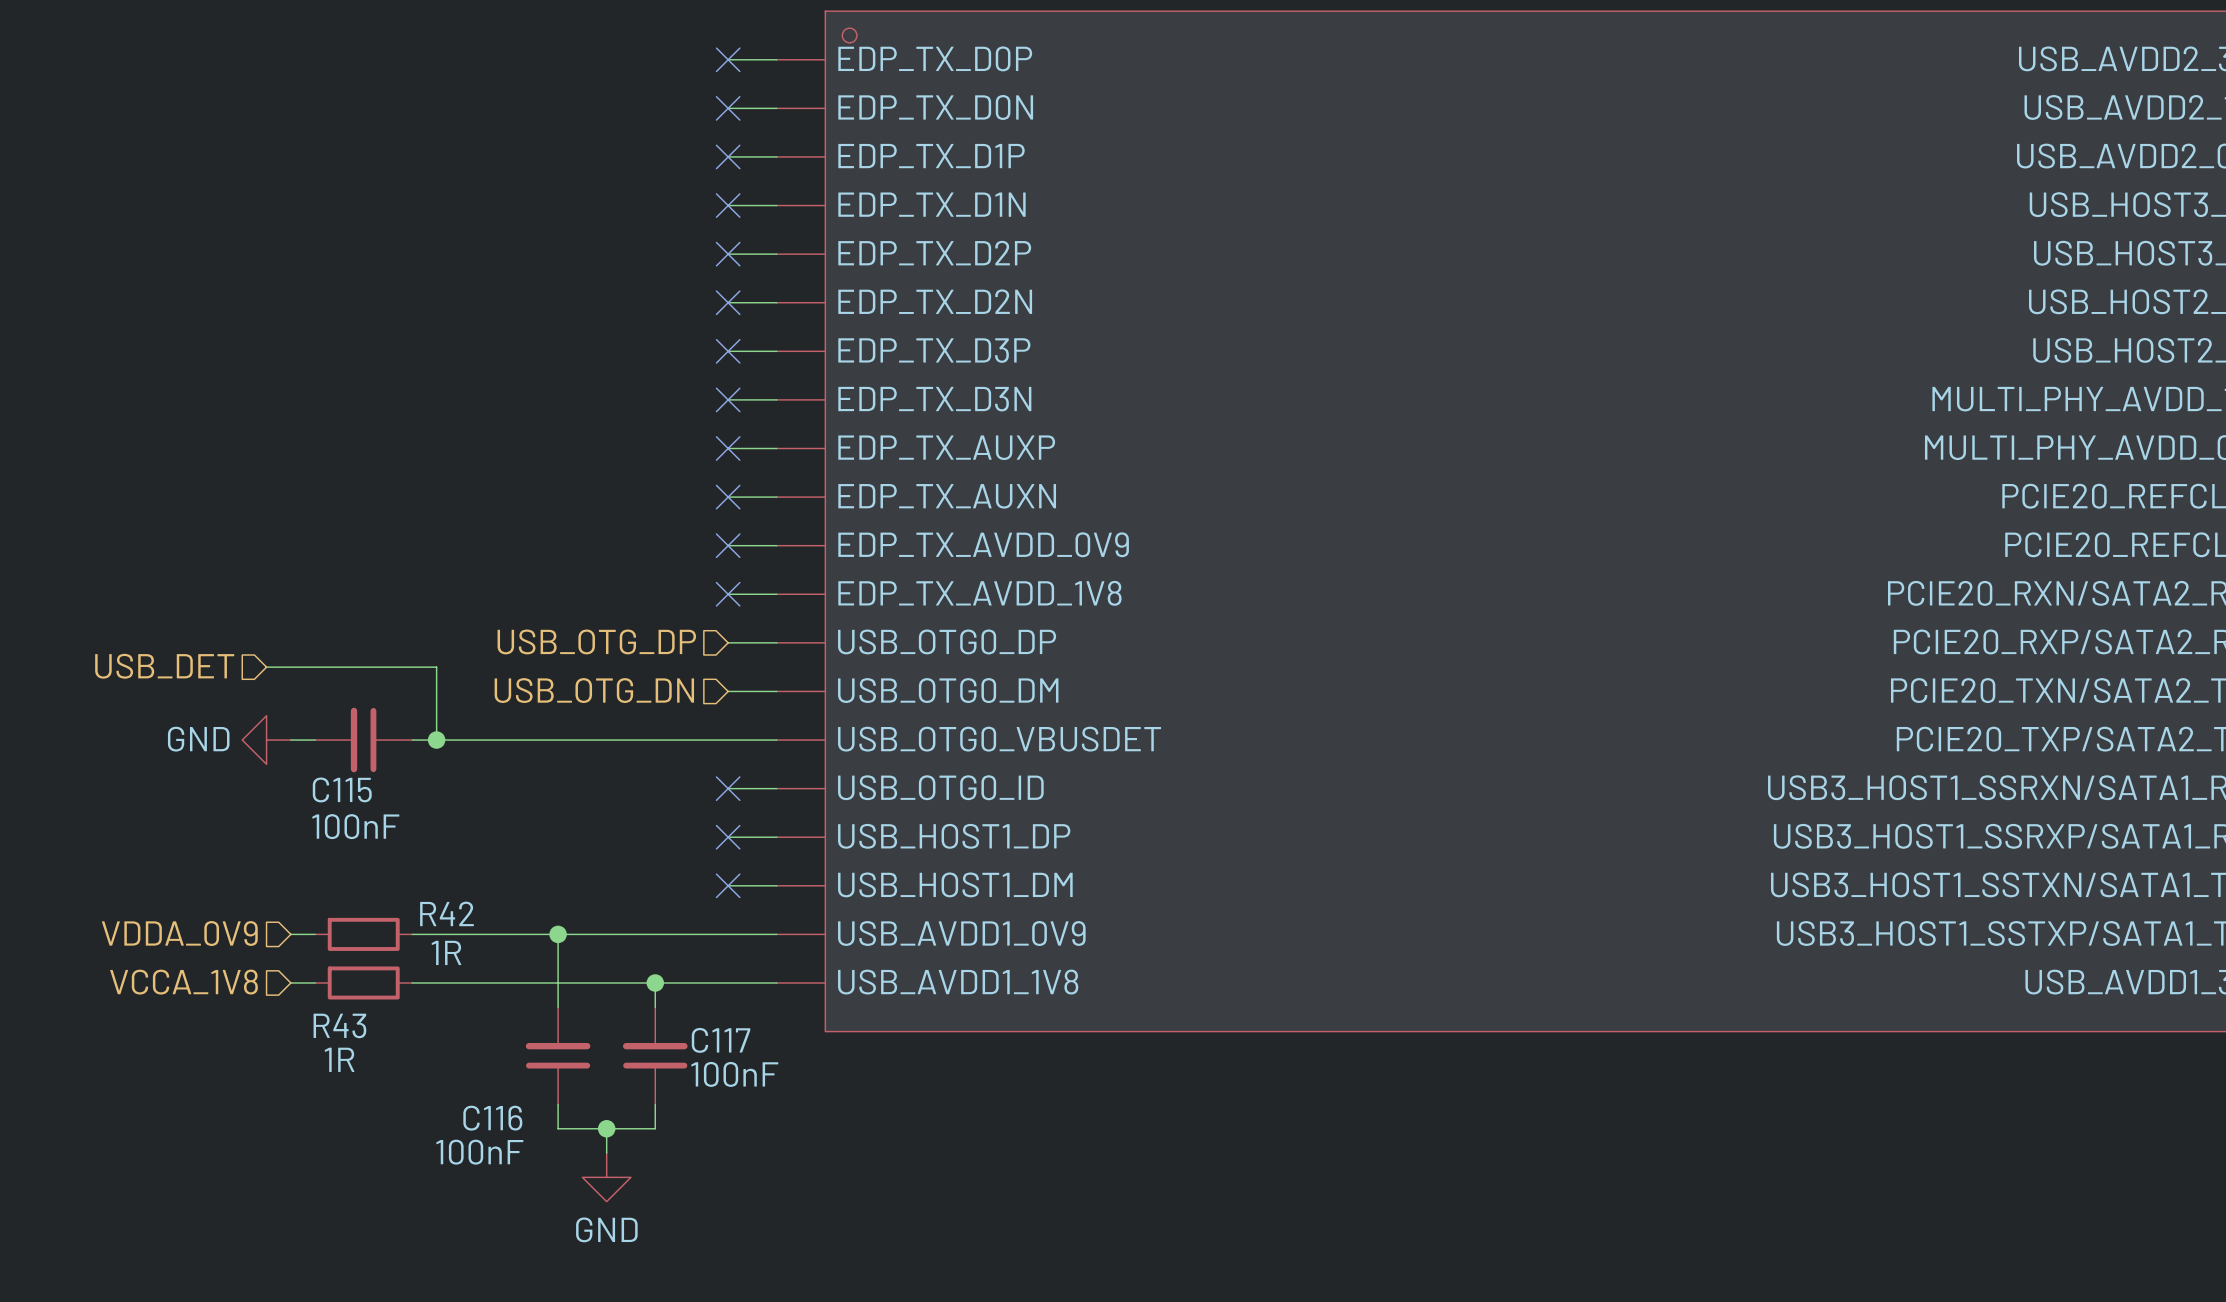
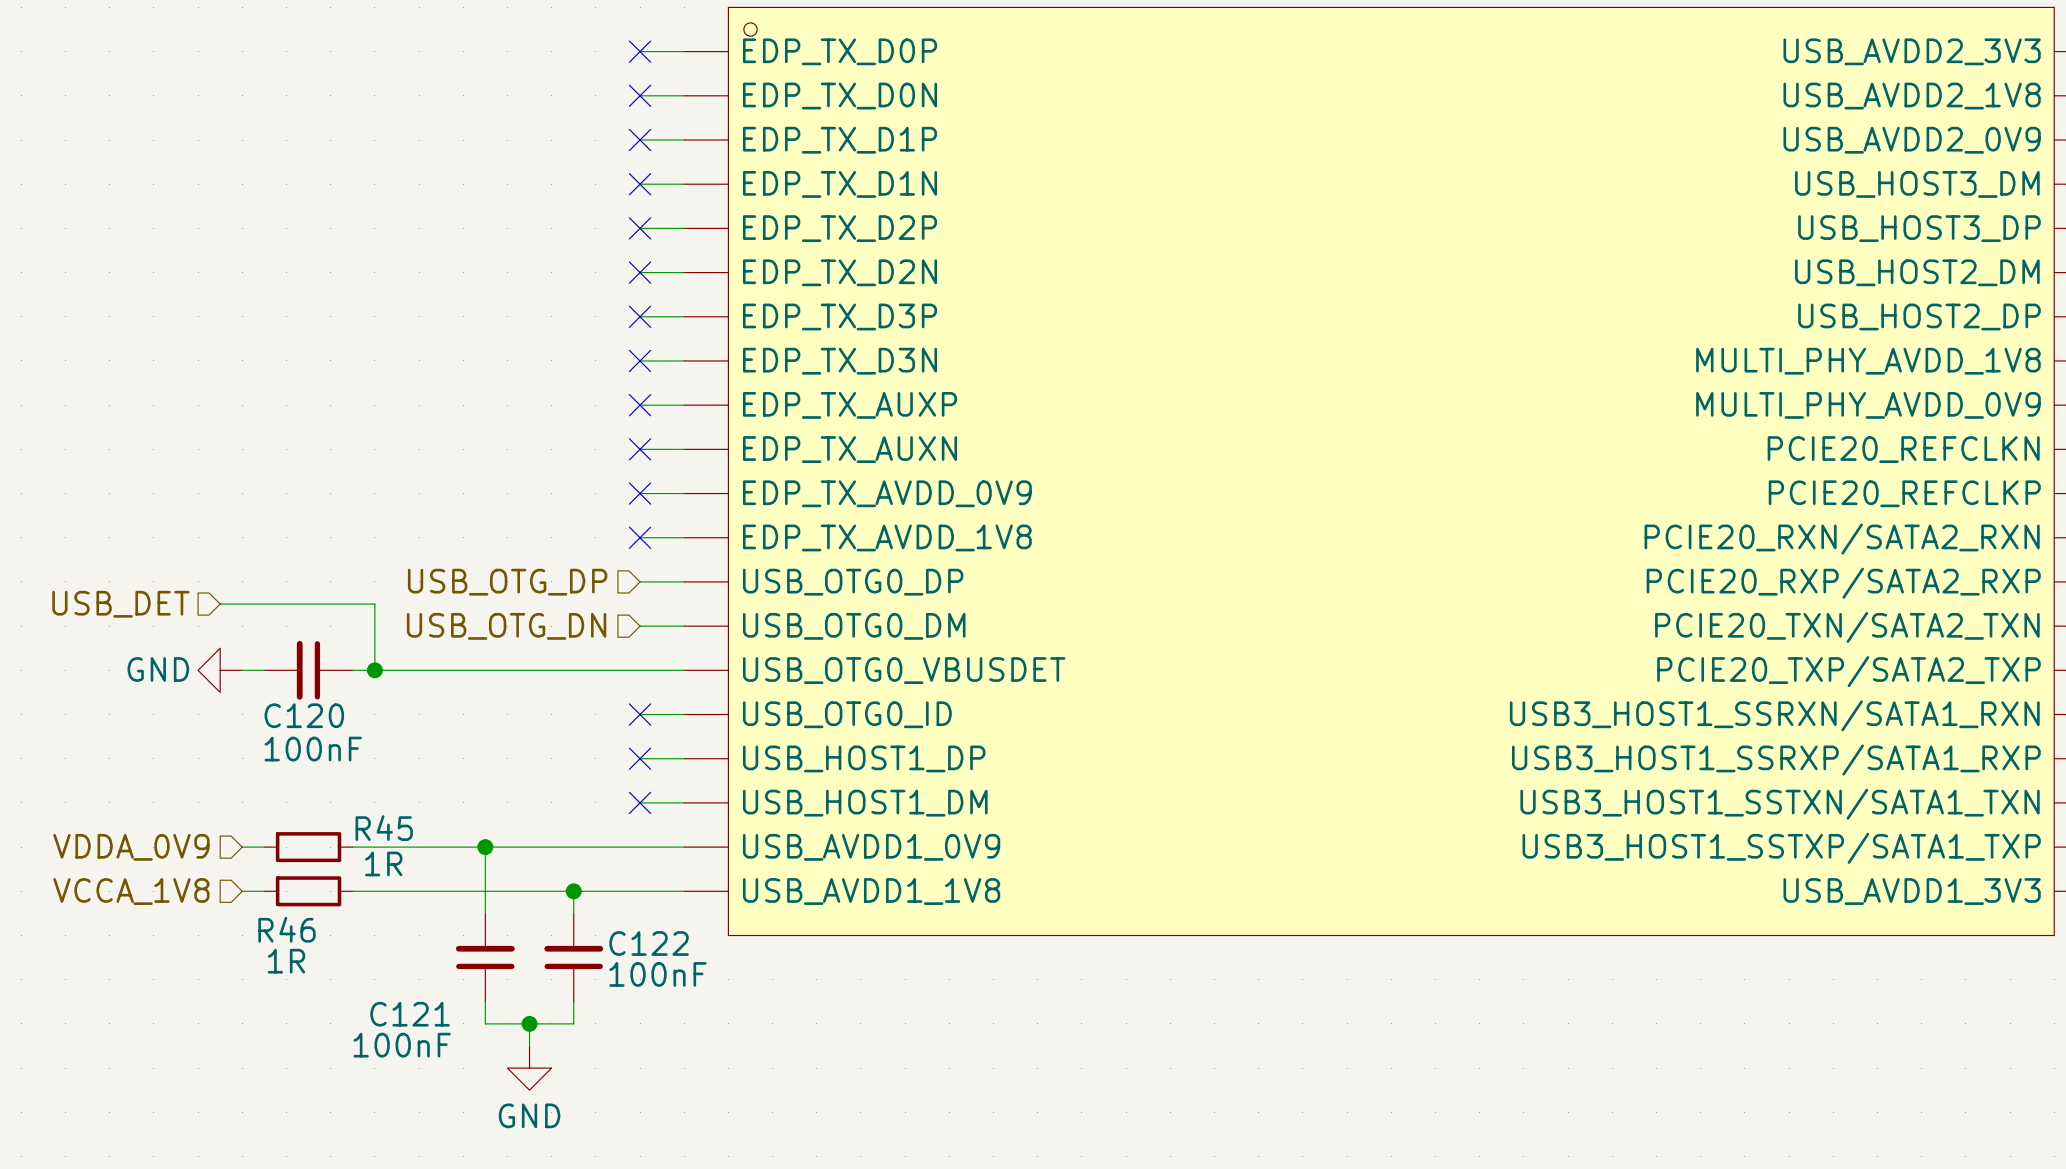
C115 name: C115 (342, 789) -> C120 (304, 715)
R42 name: R42 (446, 913) -> R45 (384, 828)
R43 name: R43 (339, 1025) -> R46 (287, 929)
C117 name: C117 (721, 1040) -> C122 (649, 943)
C116 name: C116 (492, 1118) -> C121 (410, 1014)

